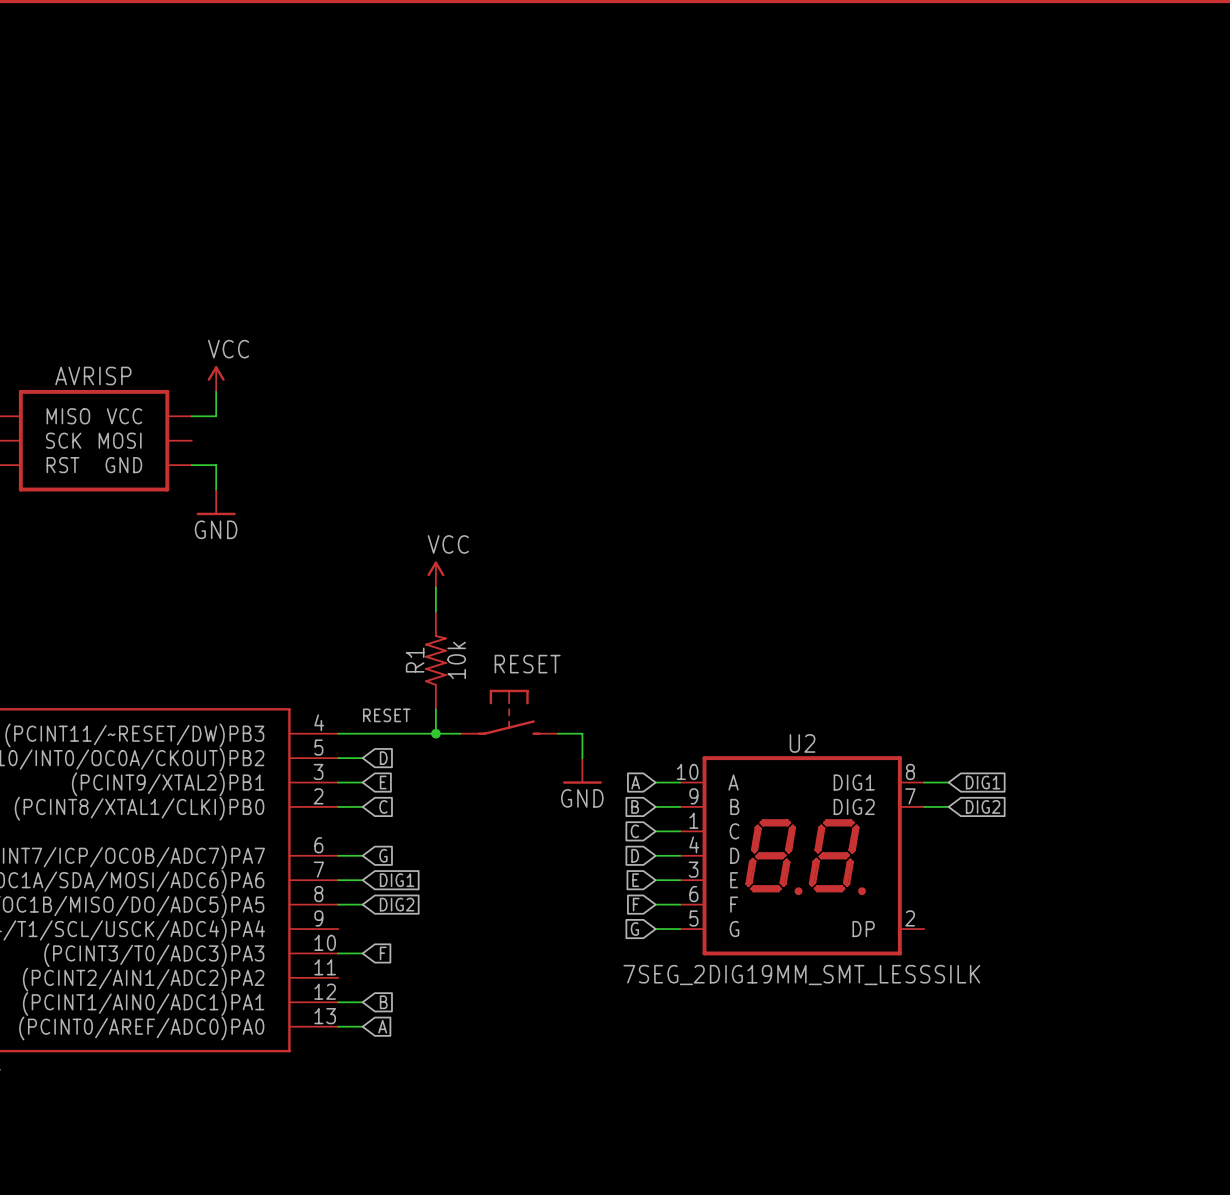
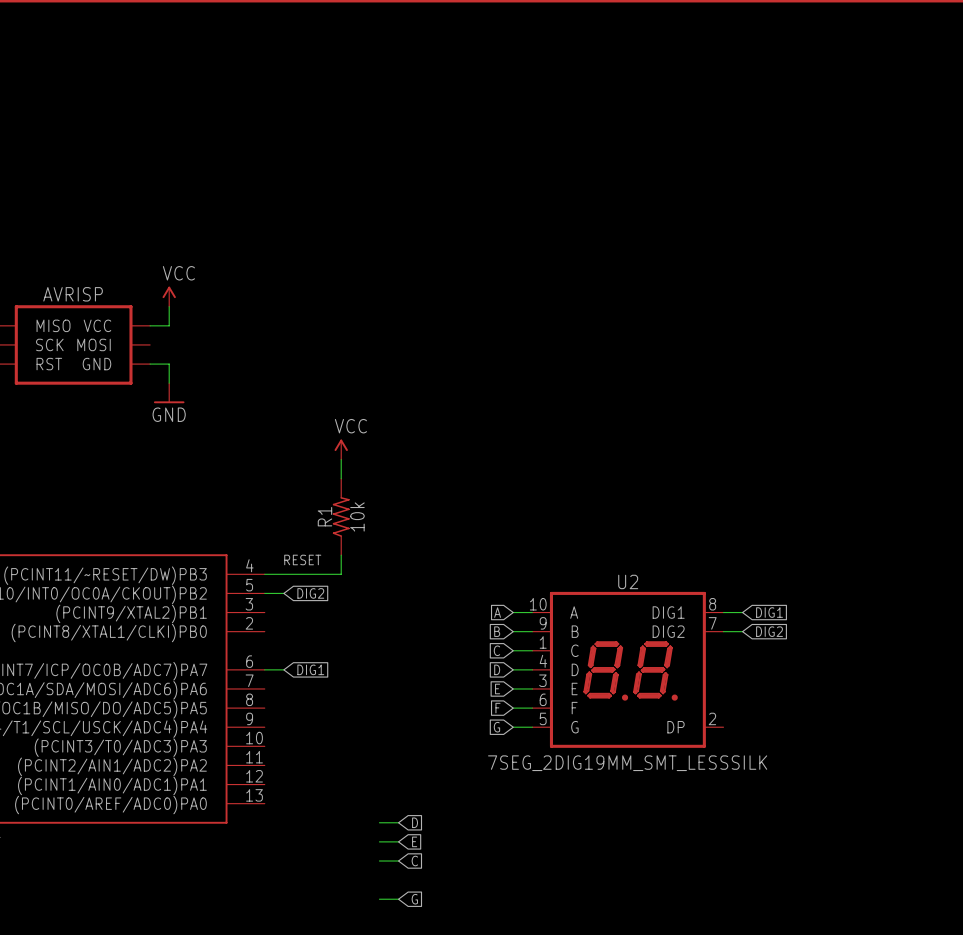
RESET: (509, 712) -> none
wire: (435, 733) (460, 733) -> none
junction: (435, 733) -> none
wire: (558, 733) (582, 733) (582, 758) -> none
global label: D (383, 758) -> DIG2 (310, 593)
power symbol: GND (582, 770) -> none
wire: (338, 782) (362, 782) -> none
global label: E (383, 782) -> none
wire: (338, 806) (362, 806) -> none
global label: C (383, 806) -> none
global label: G (383, 855) -> DIG1 (310, 669)
wire: (338, 880) (362, 880) -> none
global label: DIG1 (397, 880) -> none
wire: (338, 904) (362, 904) -> (379, 822) (398, 822)
global label: DIG2 (397, 904) -> none
wire: (338, 953) (362, 953) -> (379, 861) (398, 861)
global label: F (383, 953) -> none
wire: (338, 1002) (362, 1002) -> (379, 899) (398, 899)
global label: B (383, 1002) -> none
wire: (338, 1026) (362, 1026) -> (379, 841) (398, 841)
global label: A (382, 1026) -> none
global label: none -> D (415, 822)
global label: none -> E (414, 841)
global label: none -> C (414, 861)
global label: none -> G (414, 899)

